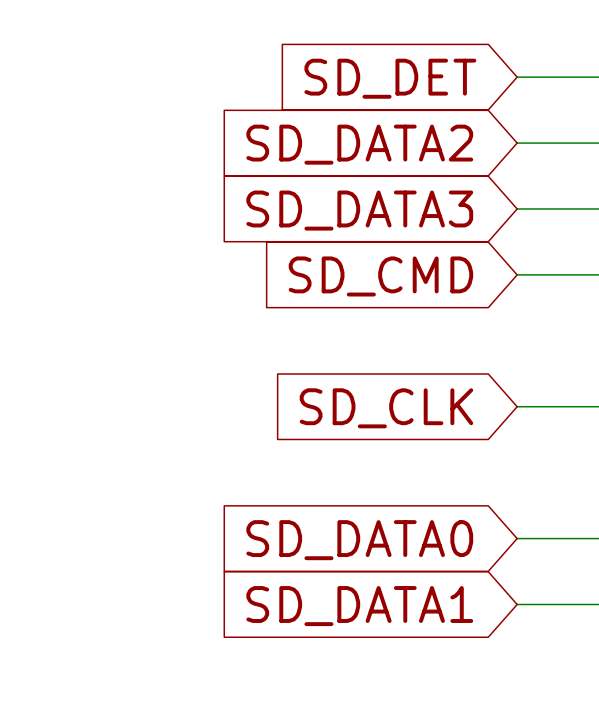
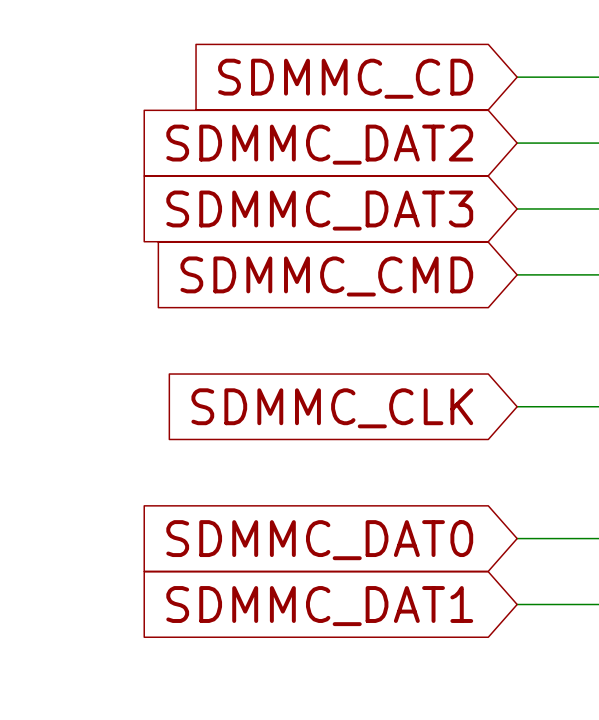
global label: SD_DET (390, 78) -> SDMMC_CD (345, 78)
global label: SD_DATA2 (359, 144) -> SDMMC_DAT2 (319, 144)
global label: SD_DATA3 (359, 210) -> SDMMC_DAT3 (319, 210)
global label: SD_CMD (380, 276) -> SDMMC_CMD (326, 276)
global label: SD_CLK (386, 408) -> SDMMC_CLK (332, 408)
global label: SD_DATA0 (359, 540) -> SDMMC_DAT0 (319, 540)
global label: SD_DATA1 (359, 606) -> SDMMC_DAT1 (319, 606)

